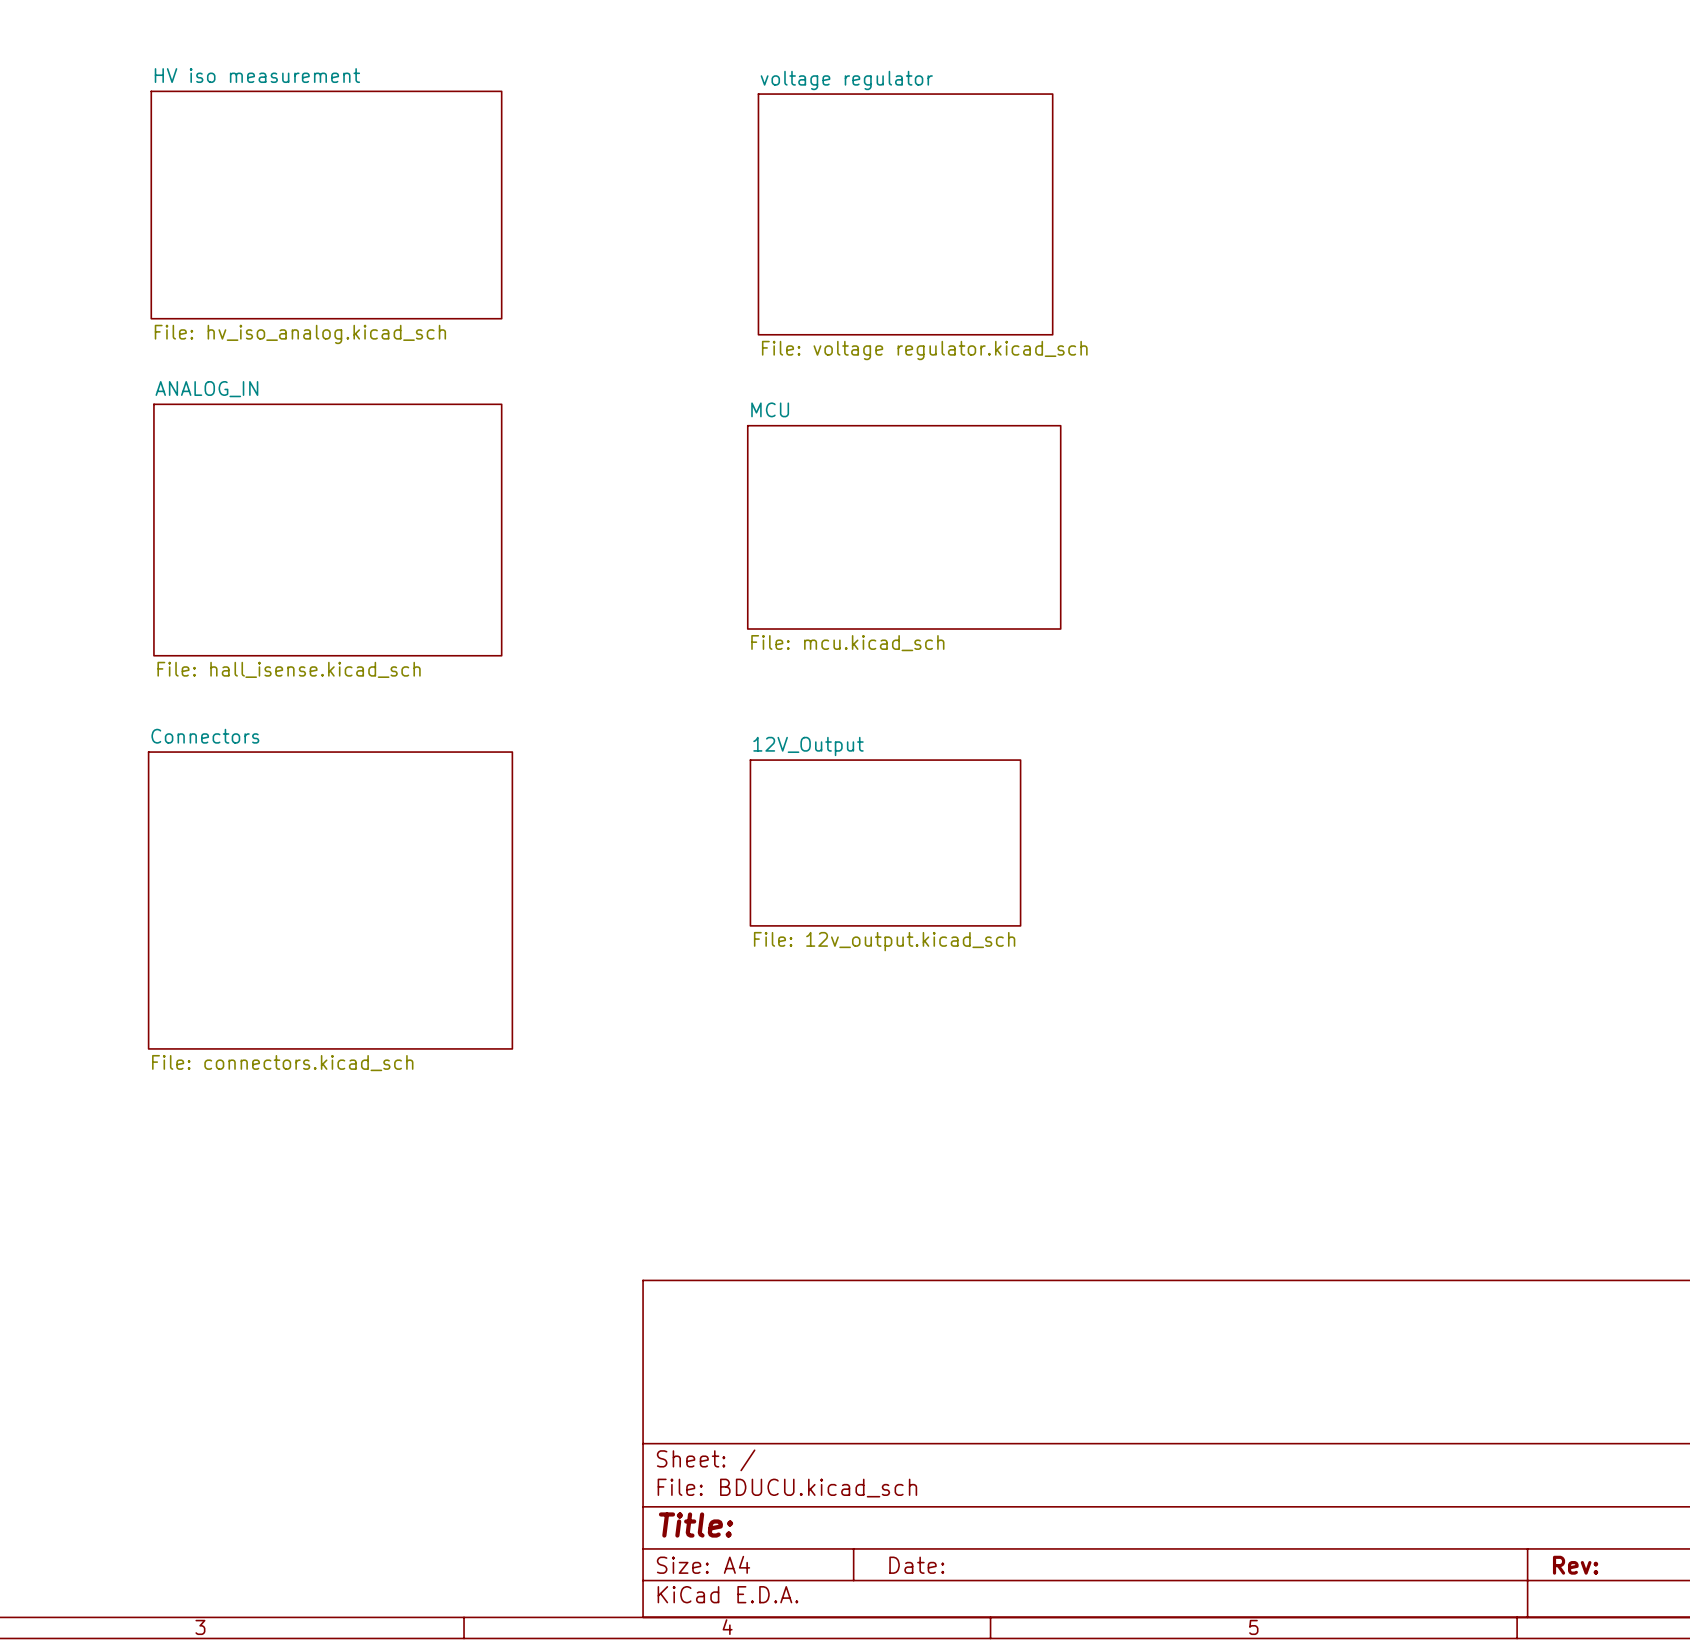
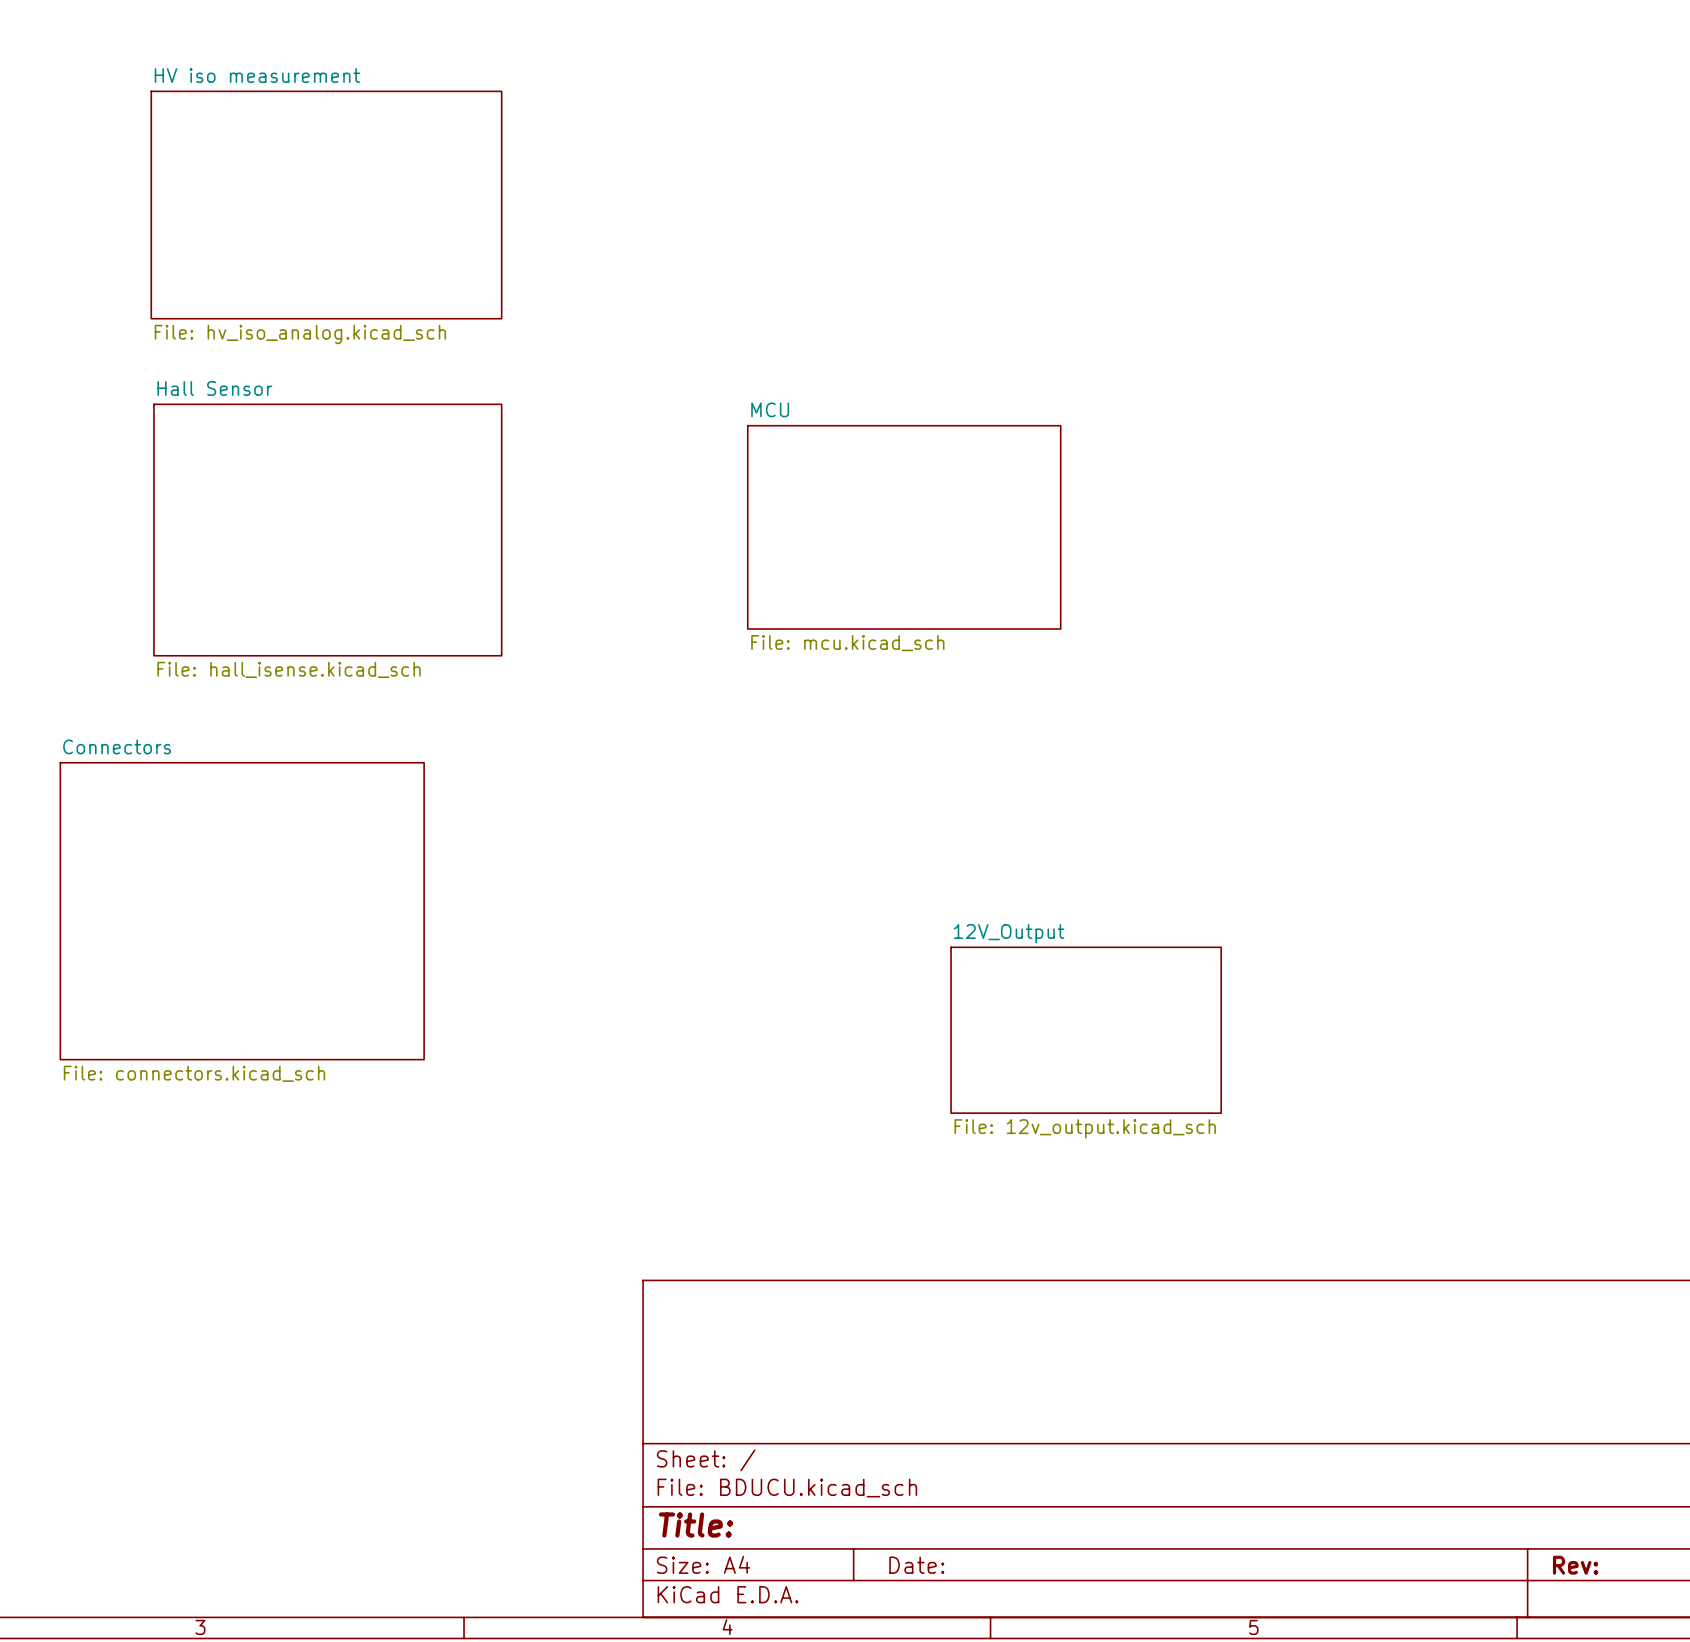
sheet voltage regulator: File: voltage regulator.kicad_sch (905, 214) -> none
sheet ANALOG_IN name: ANALOG_IN (206, 389) -> Hall Sensor (214, 388)
sheet 12V_Output position: (885, 842) -> (1086, 1030)
sheet Connectors position: (330, 900) -> (242, 911)

